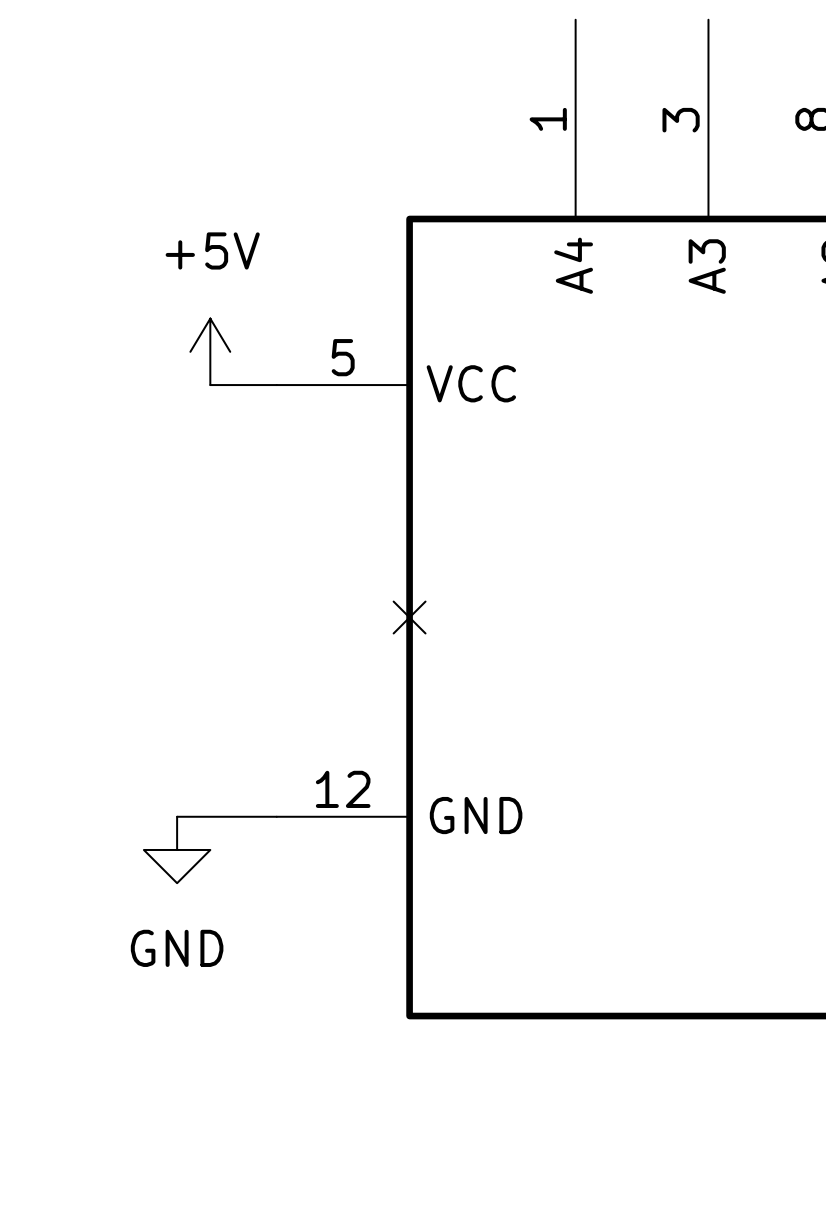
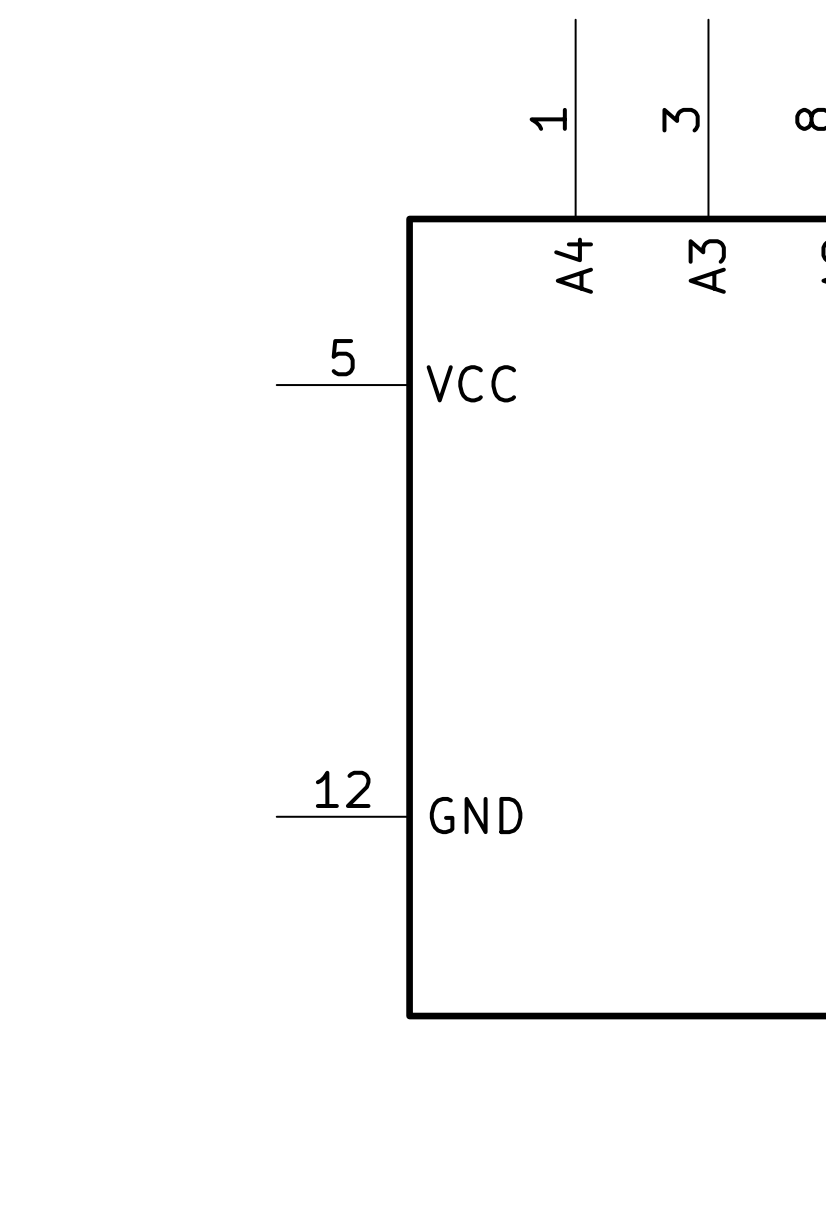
power symbol: +5V (210, 351) -> none
wire: (210, 385) (276, 385) -> none
no-connect mark: (409, 617) -> none
wire: (177, 816) (276, 816) -> none
power symbol: GND (177, 849) -> none

